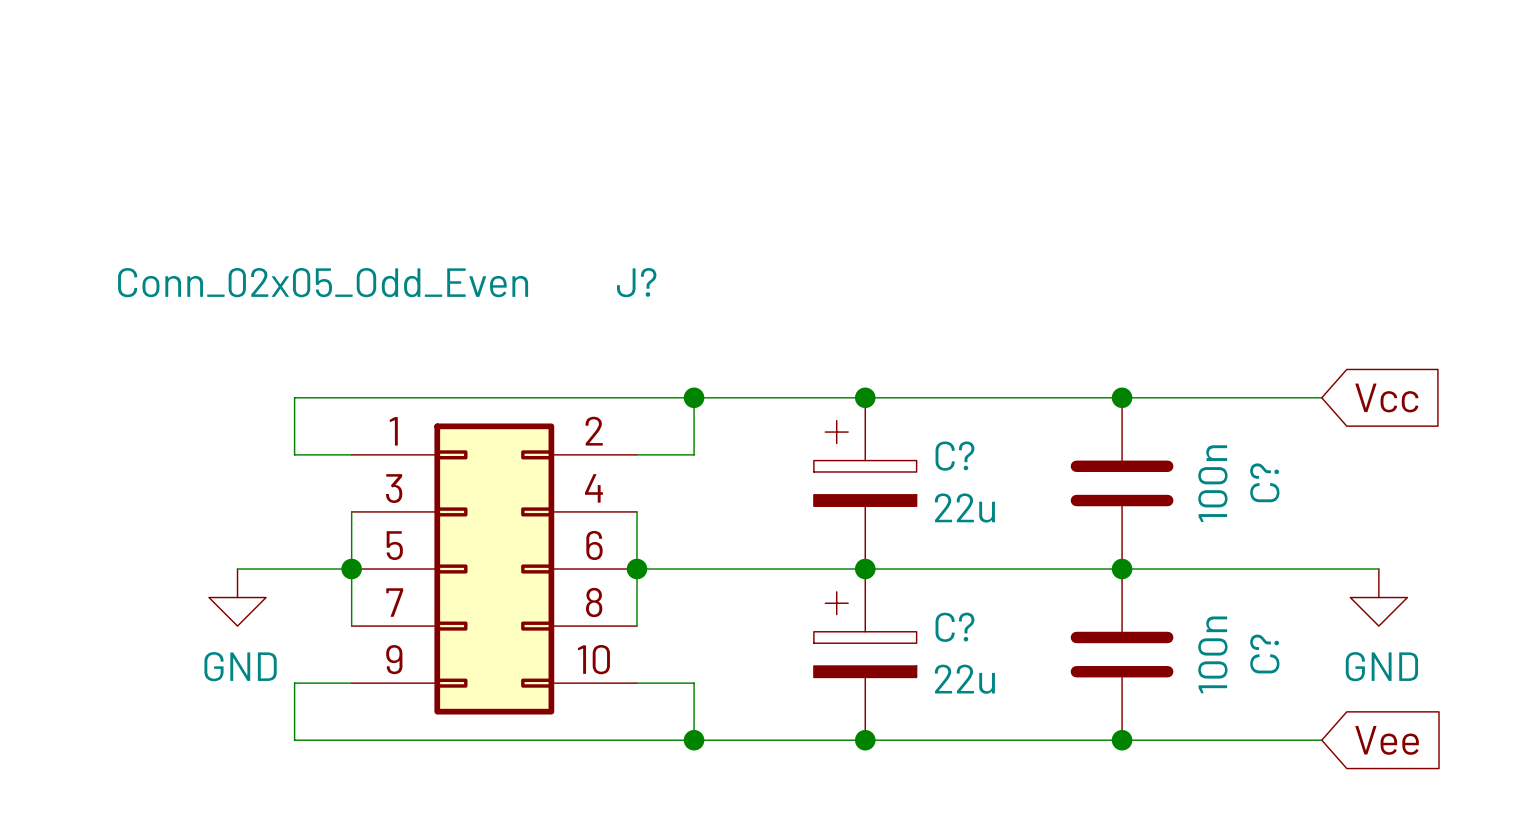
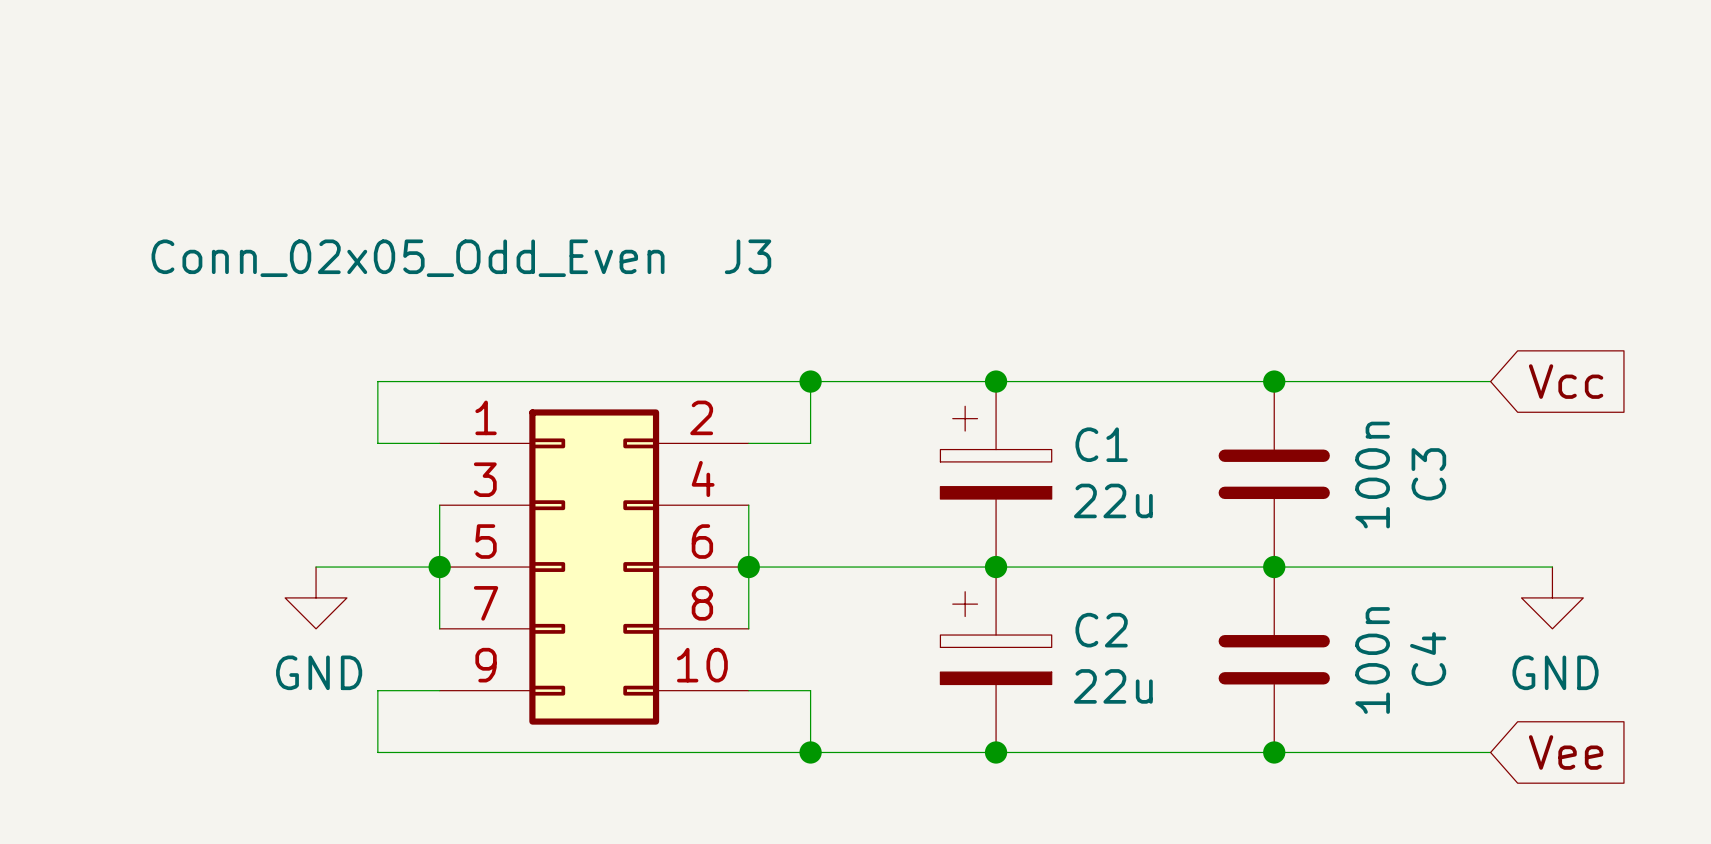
J? name: J? (636, 282) -> J3 (748, 256)
C? name: C? (954, 456) -> C1 (1101, 444)
C? name: C? (1264, 482) -> C3 (1428, 474)
C? name: C? (954, 627) -> C2 (1101, 630)
C? name: C? (1264, 654) -> C4 (1428, 659)

